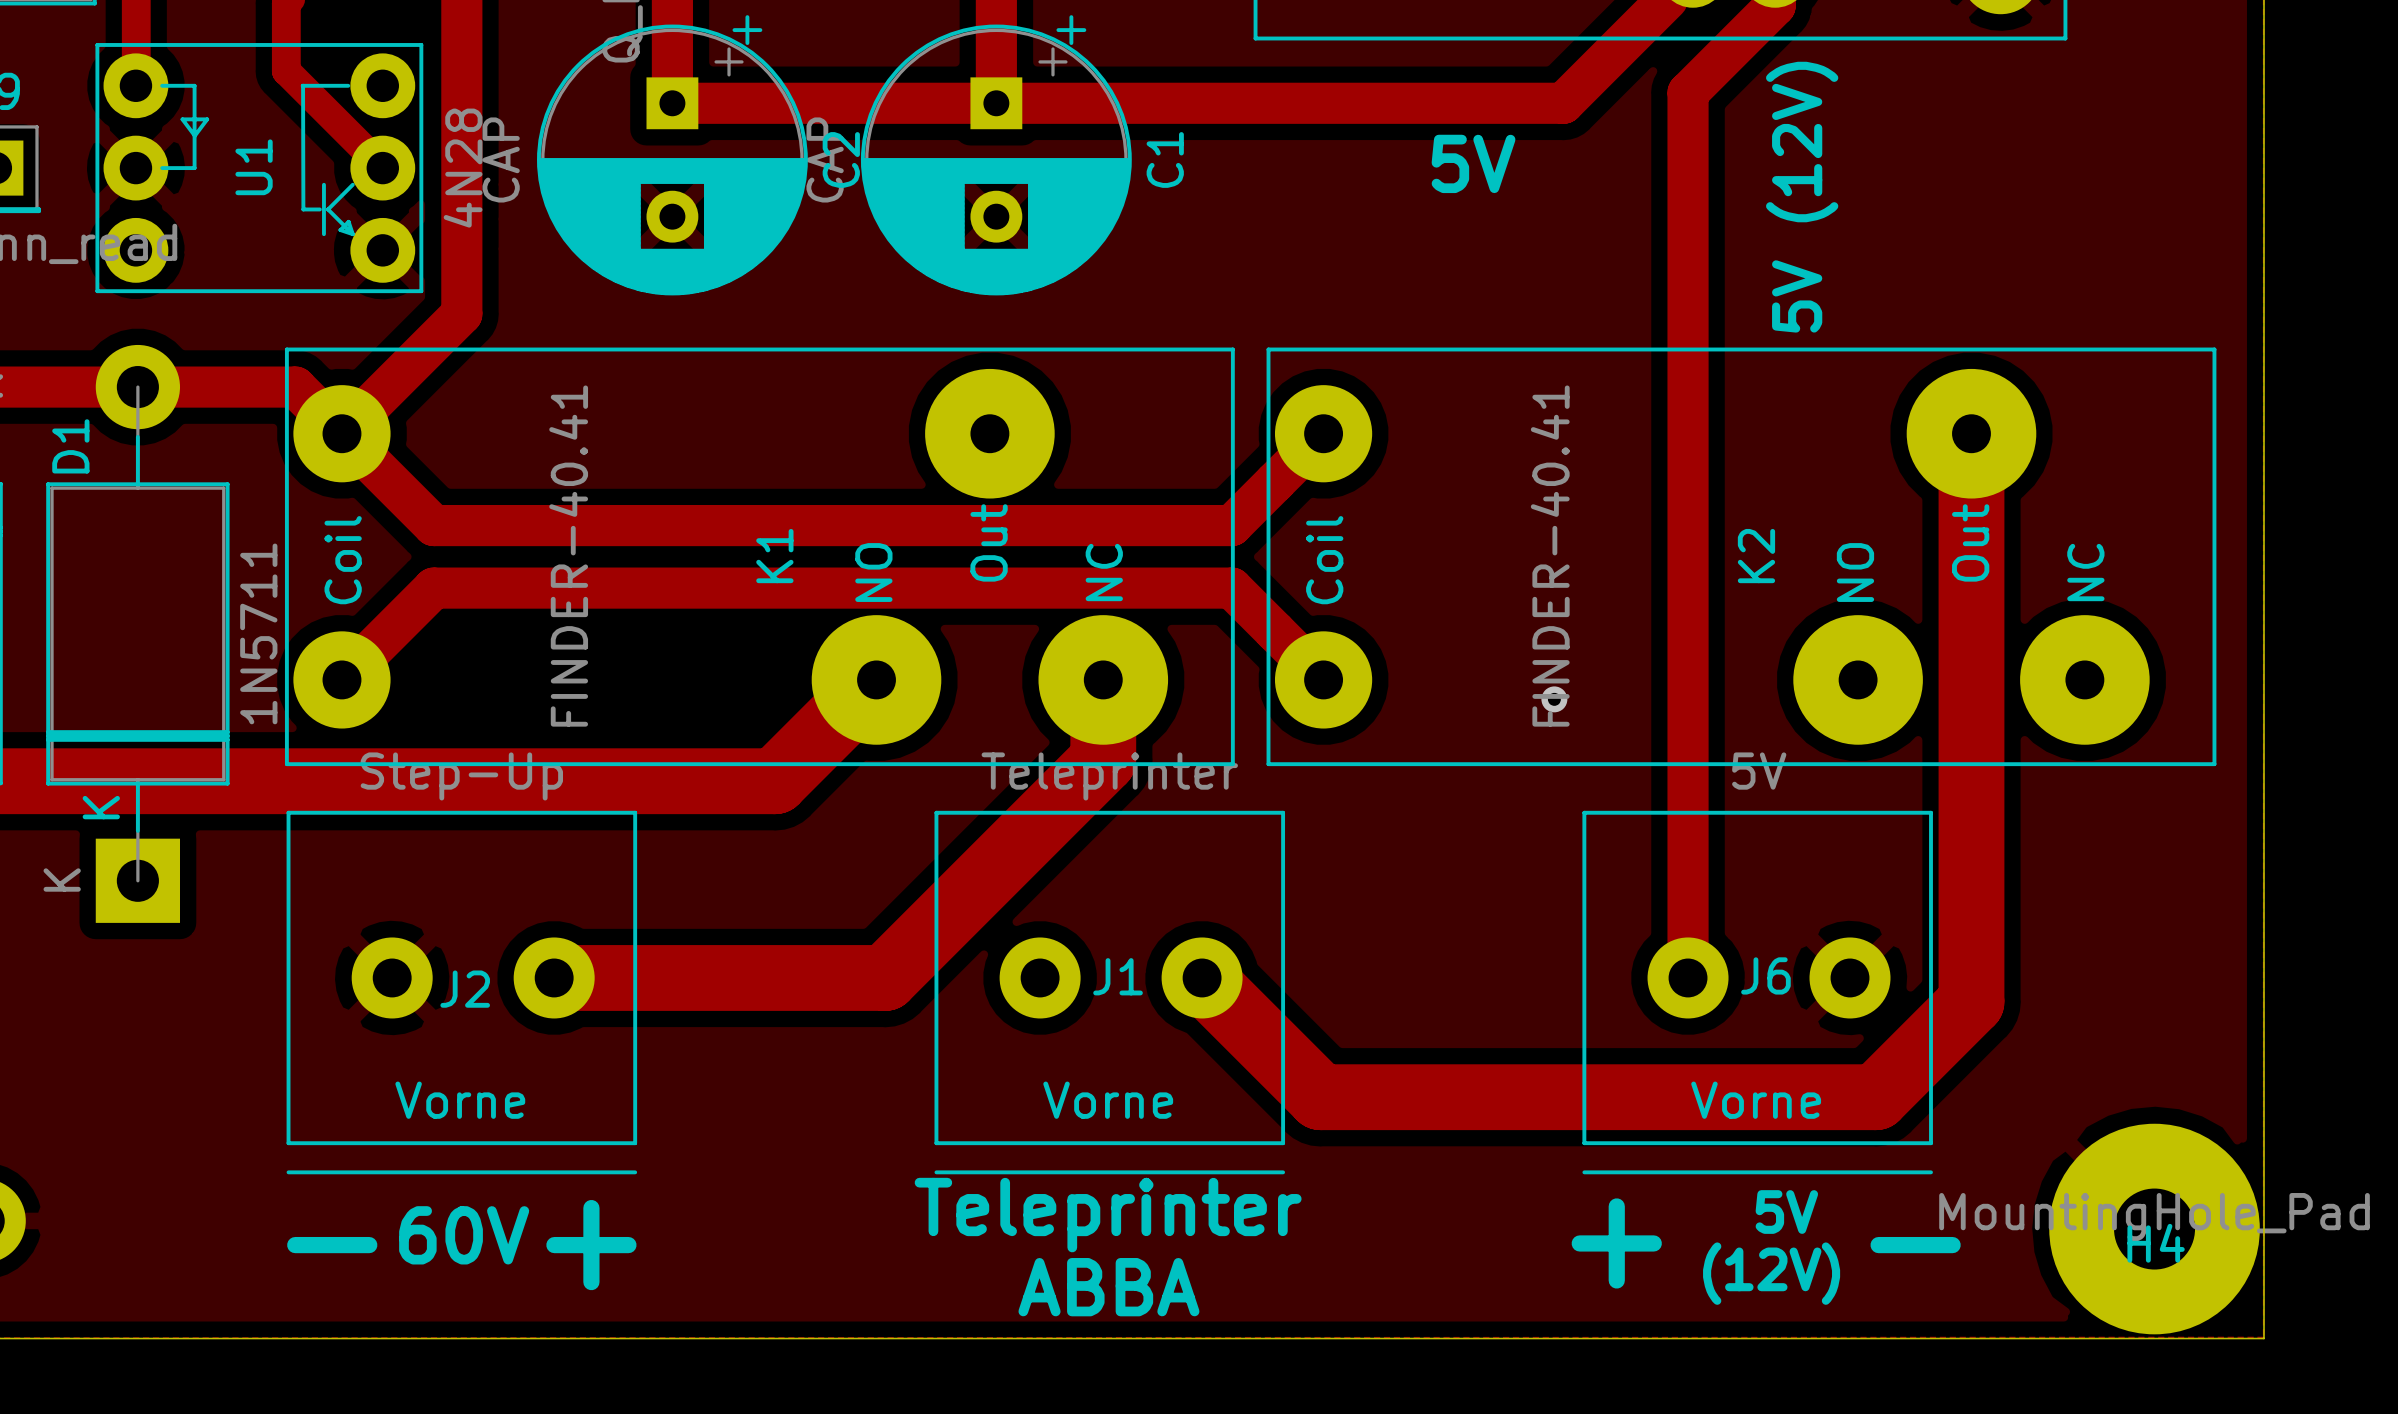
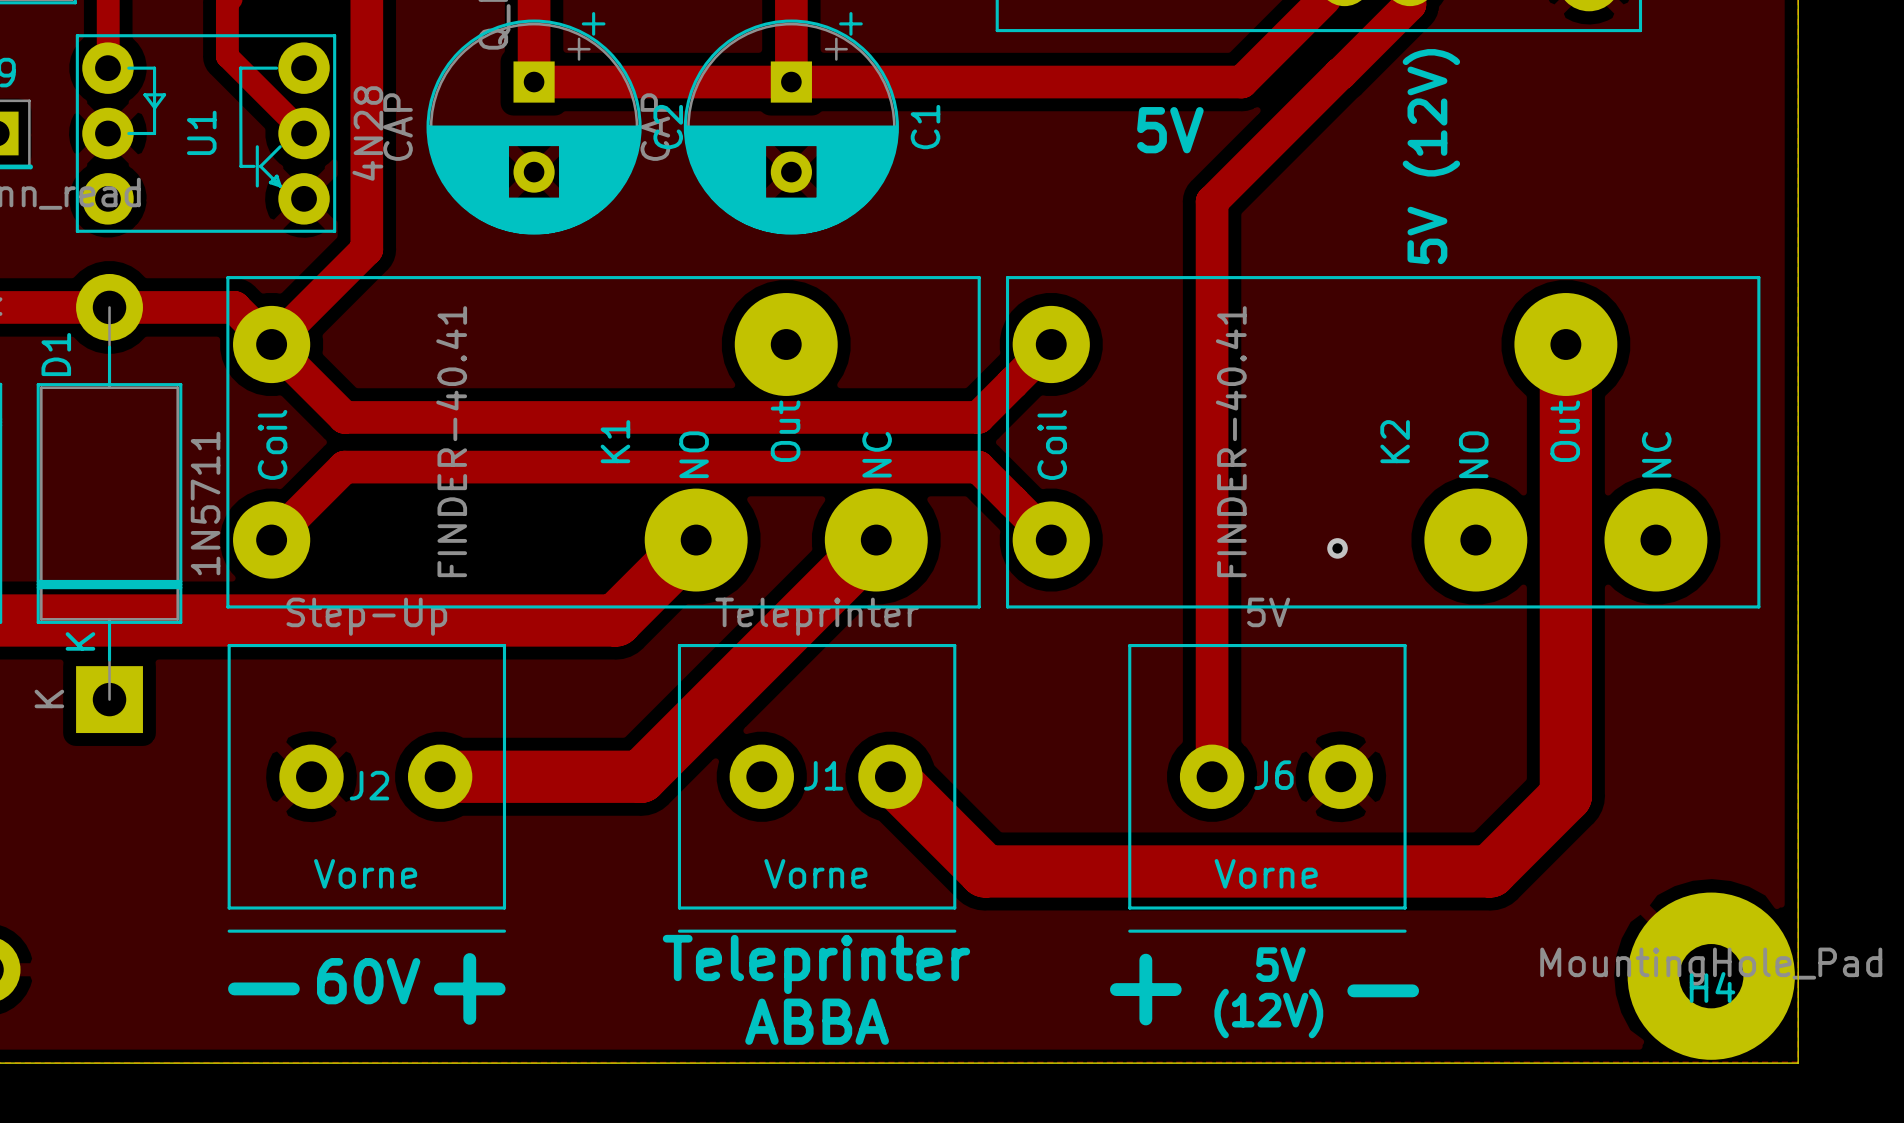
track: (1688, 92) (1688, 977) -> (1340, 73) (1212, 201) (1212, 776)
track: (1103, 681) (1103, 759) (885, 977) (806, 977) -> (876, 541) (640, 776)
via position: (1554, 699) -> (1337, 548)
track: (1202, 977) (1320, 1097) -> (890, 776) (985, 871) (1048, 871)
J1 position: (1109, 992) -> (817, 788)
J6 position: (1757, 992) -> (1267, 788)
text position: 5V (1786, 1212) -> 5V (1280, 964)
text position: Teleprinter (1108, 1215) -> Teleprinter (816, 964)
text position: + (1616, 1243) -> + (1145, 989)
text position: - (1915, 1245) -> - (1383, 990)
text position: (12V) (1771, 1273) -> (12V) (1268, 1013)
text position: ABBA (1108, 1287) -> ABBA (817, 1021)

